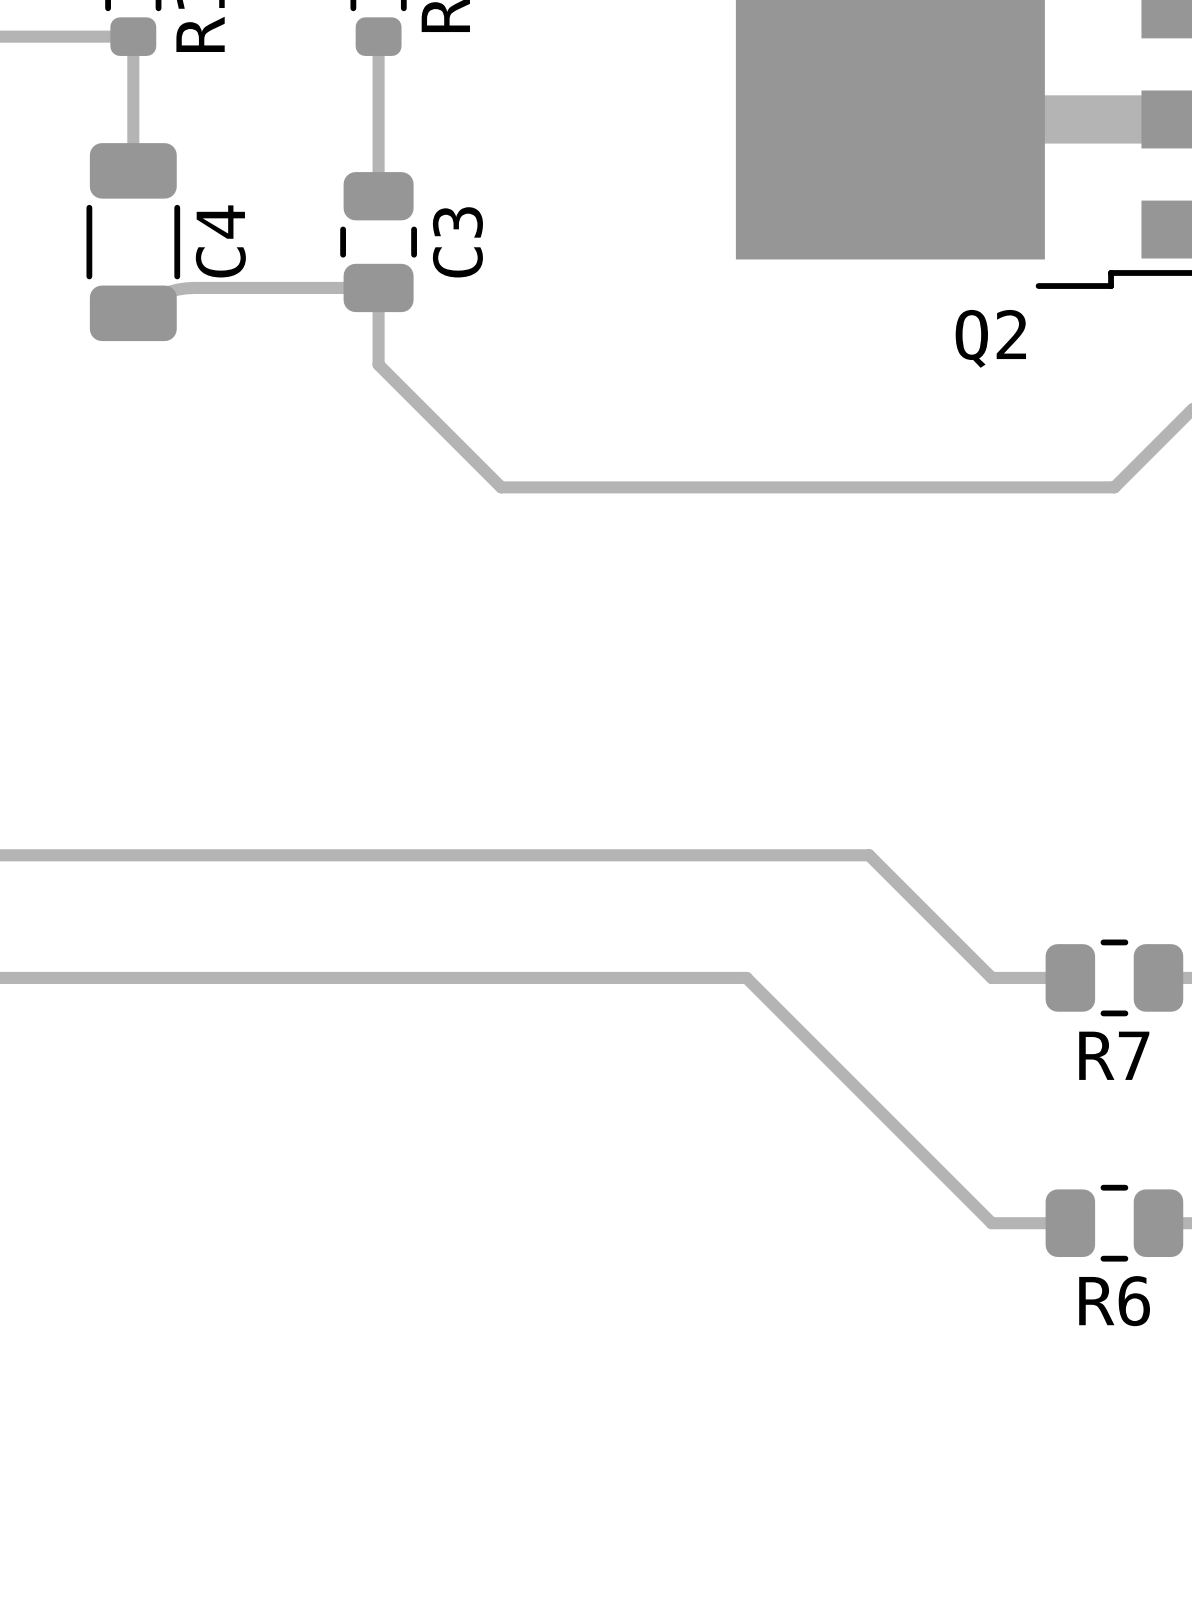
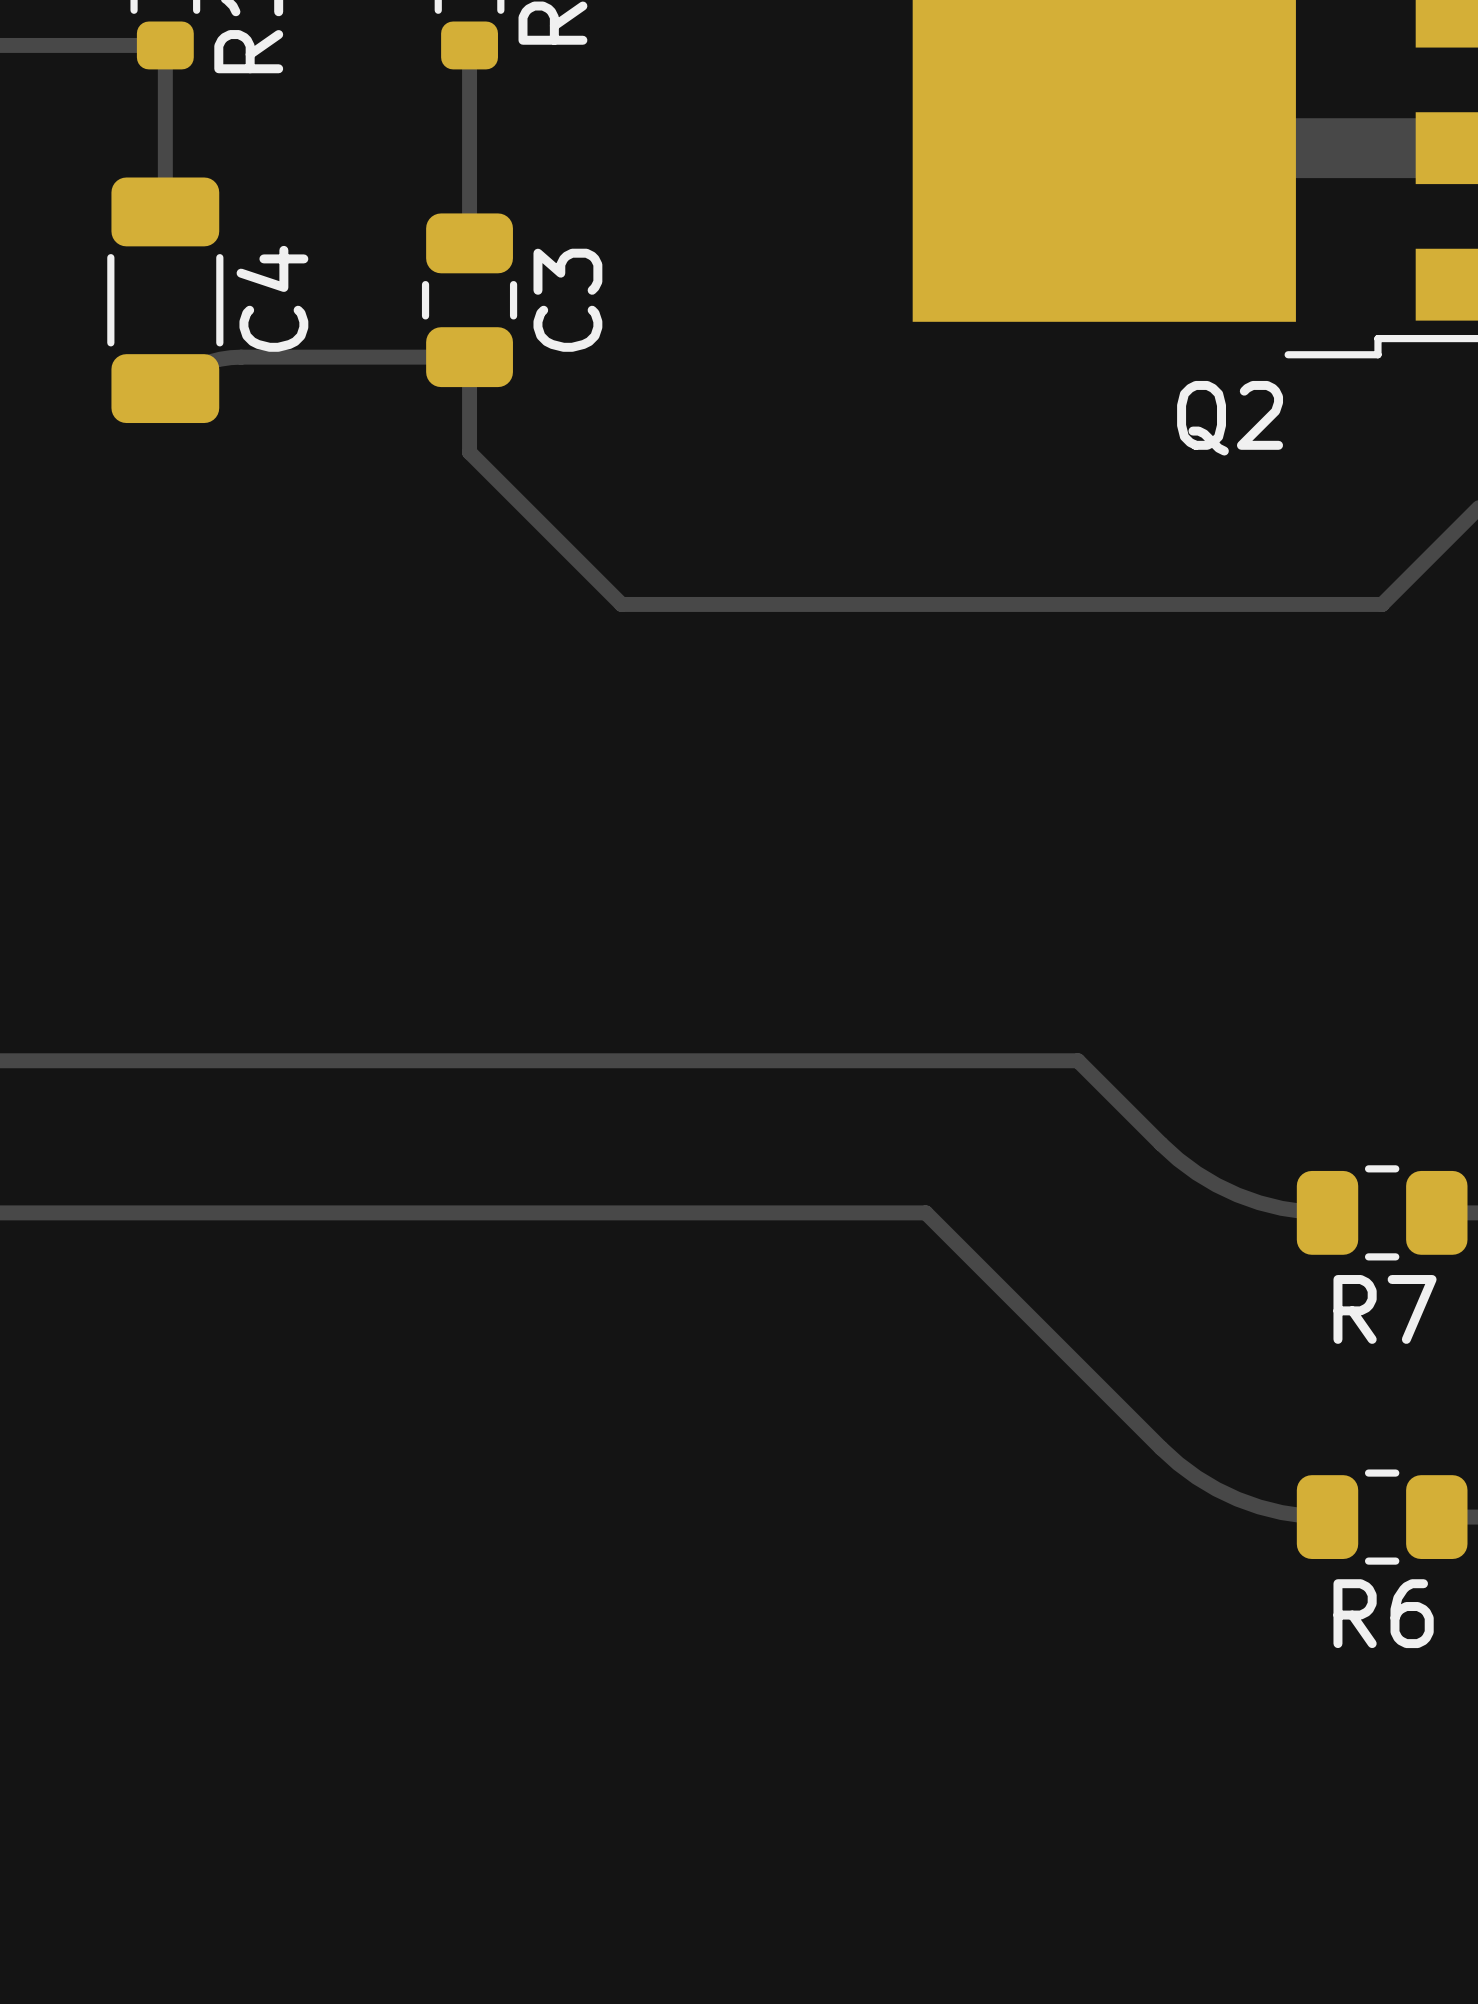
track: (936, 922) (991, 977) (1070, 977) -> (1161, 1143) (1196, 1173) (1237, 1194) (1281, 1208) (1327, 1212)
track: (936, 1167) (991, 1223) (1070, 1223) -> (1161, 1448) (1196, 1477) (1237, 1499) (1281, 1512) (1327, 1517)

